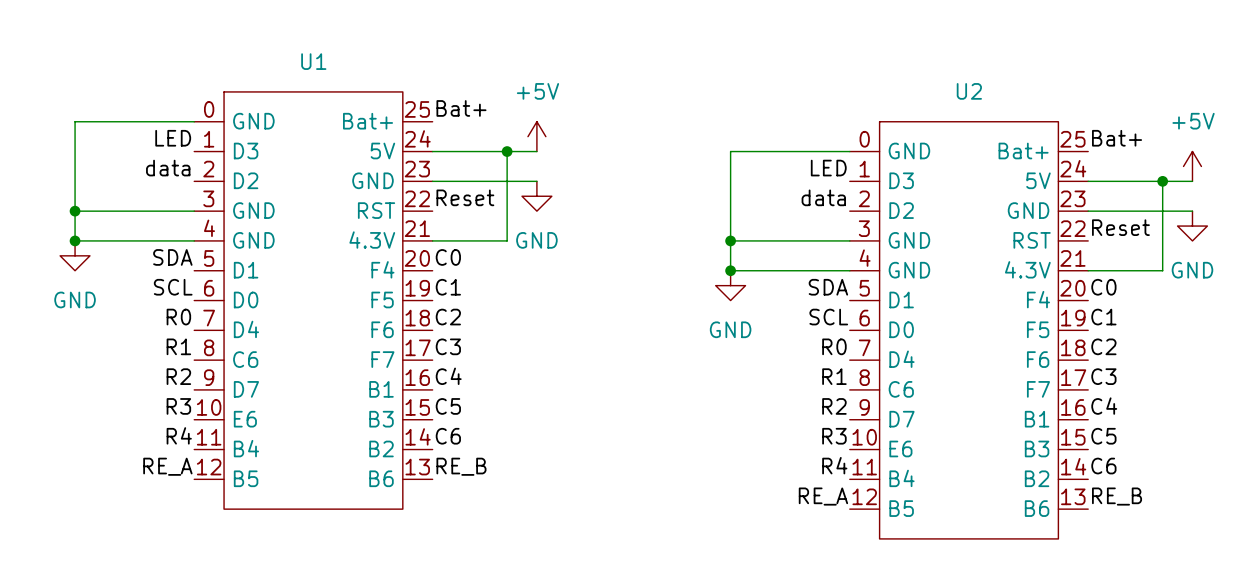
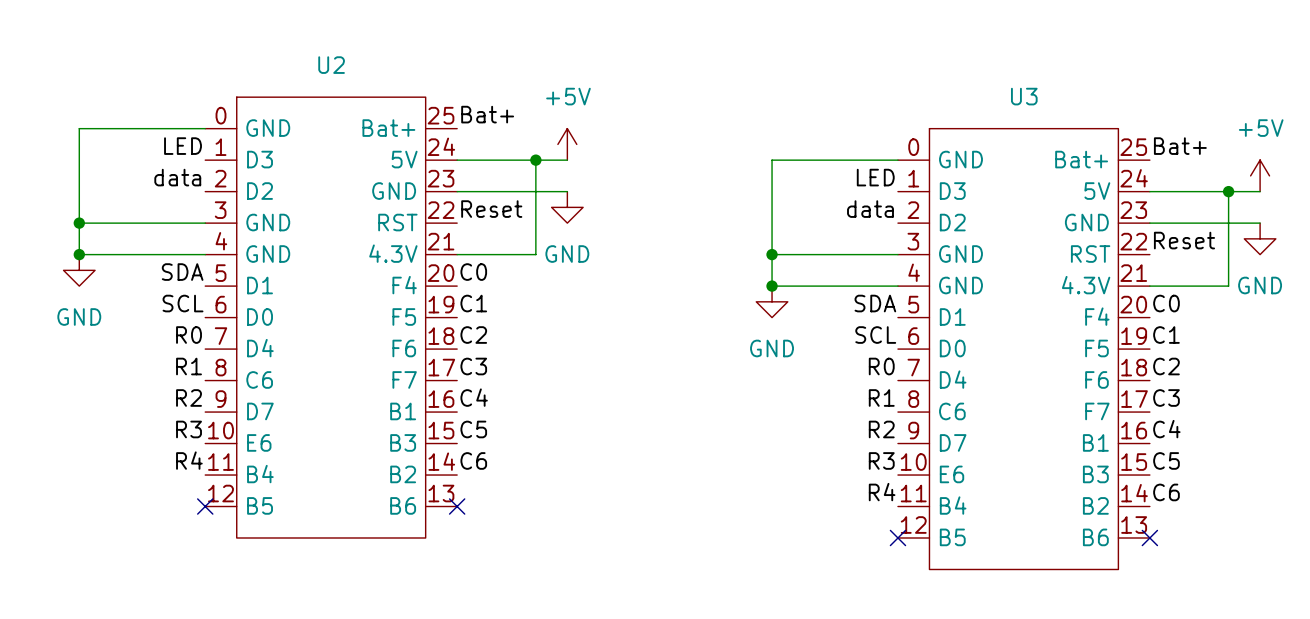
U1 name: U1 (313, 61) -> U2 (331, 65)
U2 name: U2 (969, 91) -> U3 (1024, 96)
label: RE_A (167, 466) -> none
label: RE_B (461, 466) -> none
no-connect mark: none -> (205, 506)
no-connect mark: none -> (457, 506)
label: RE_A (823, 496) -> none
label: RE_B (1117, 496) -> none
no-connect mark: none -> (897, 537)
no-connect mark: none -> (1149, 537)

